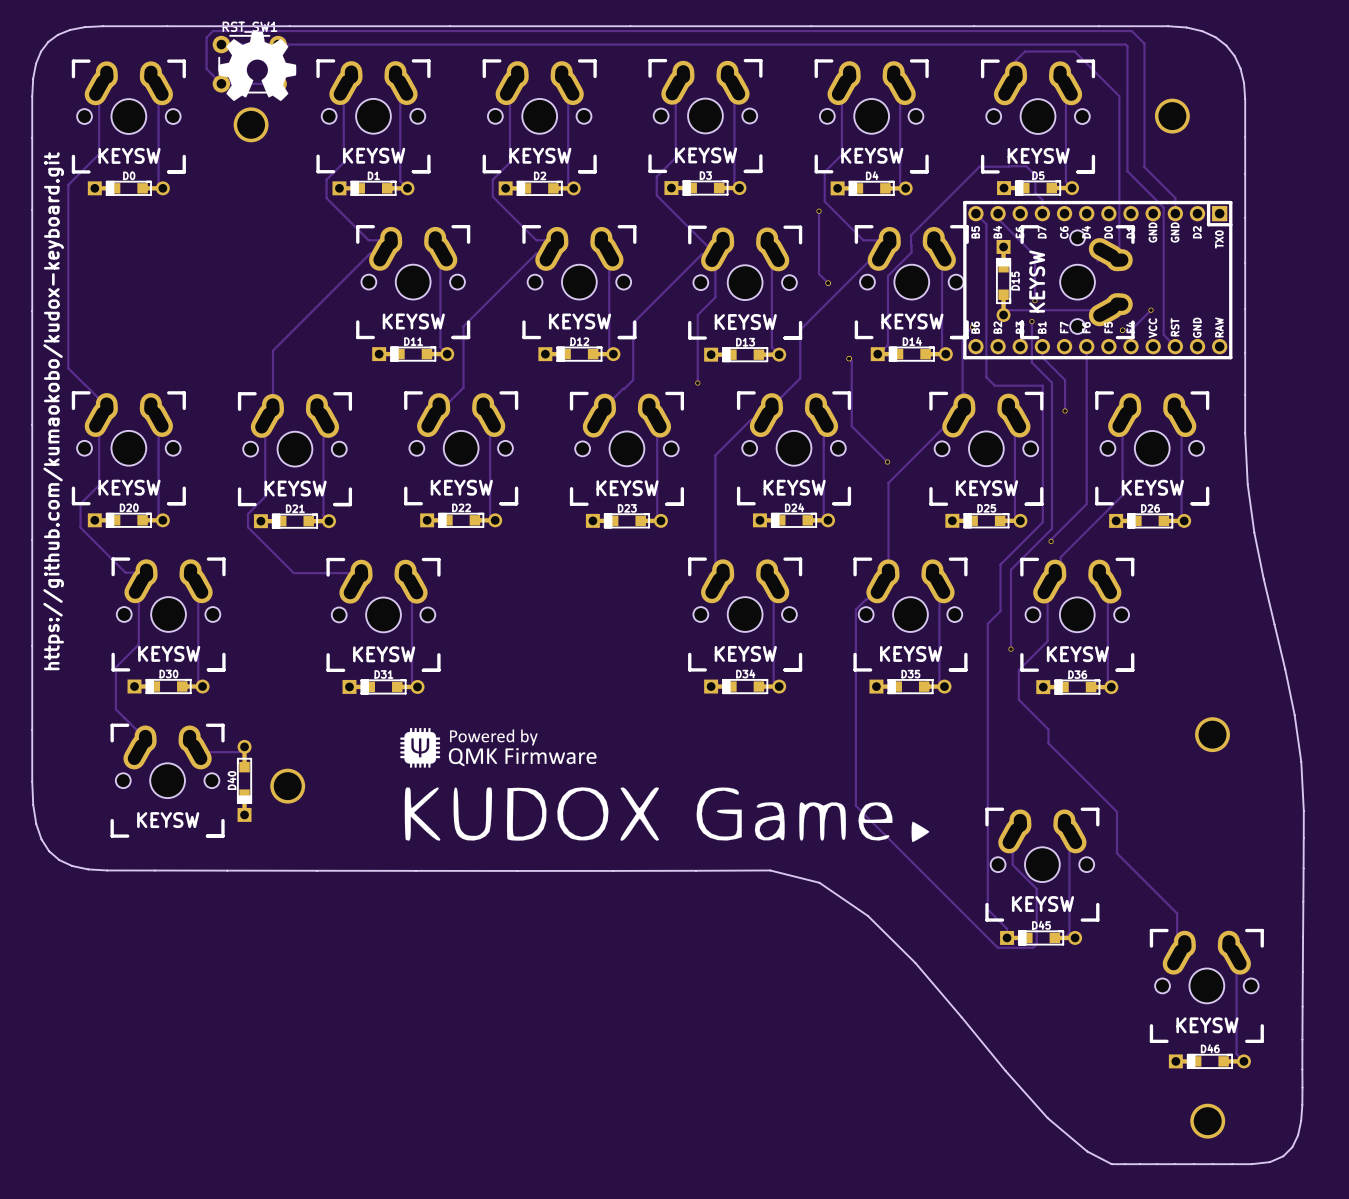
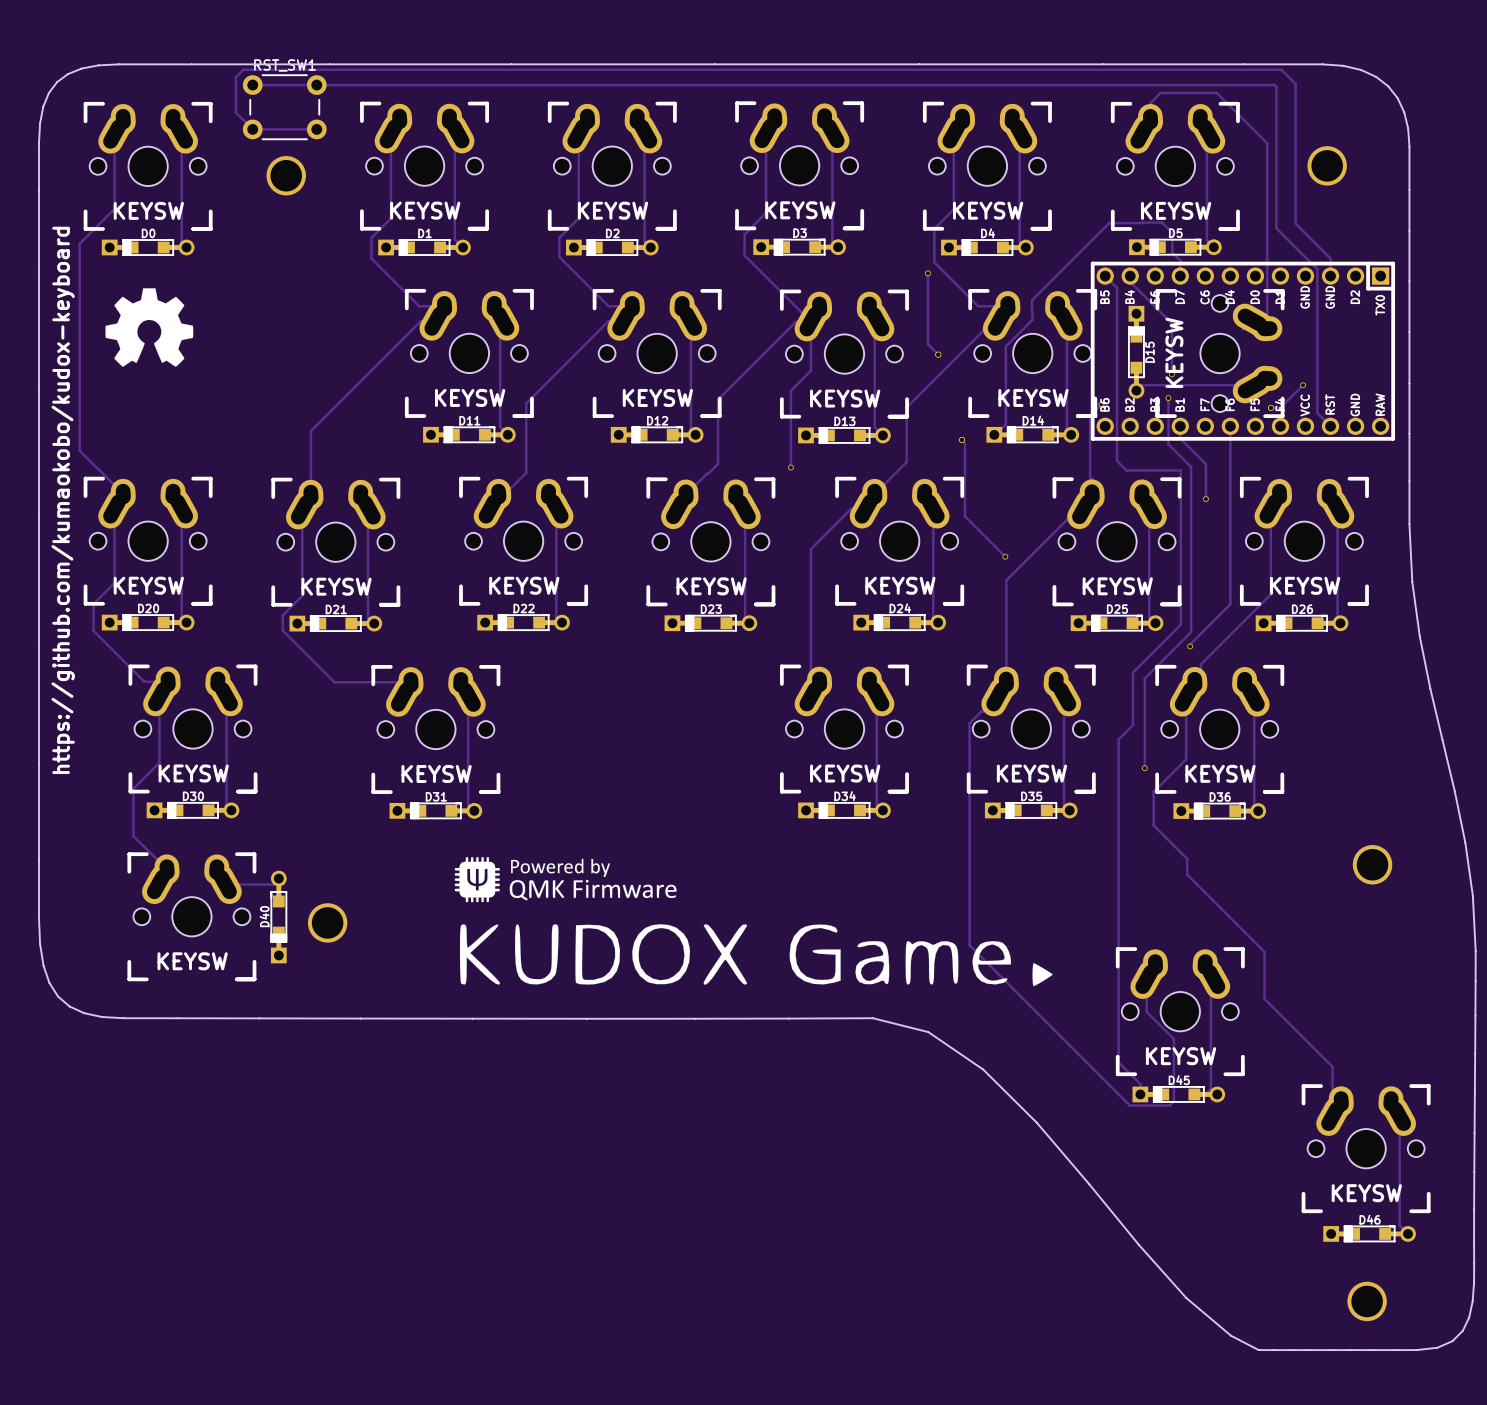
drawing: [218, 31, 297, 102] -> none
drawing: none -> [105, 288, 194, 367]
text: https://github.com/kumaokobo/kudox-keyboard.git (53, 411) -> https://github.com/kumaokobo/kudox-keyboard (63, 500)

